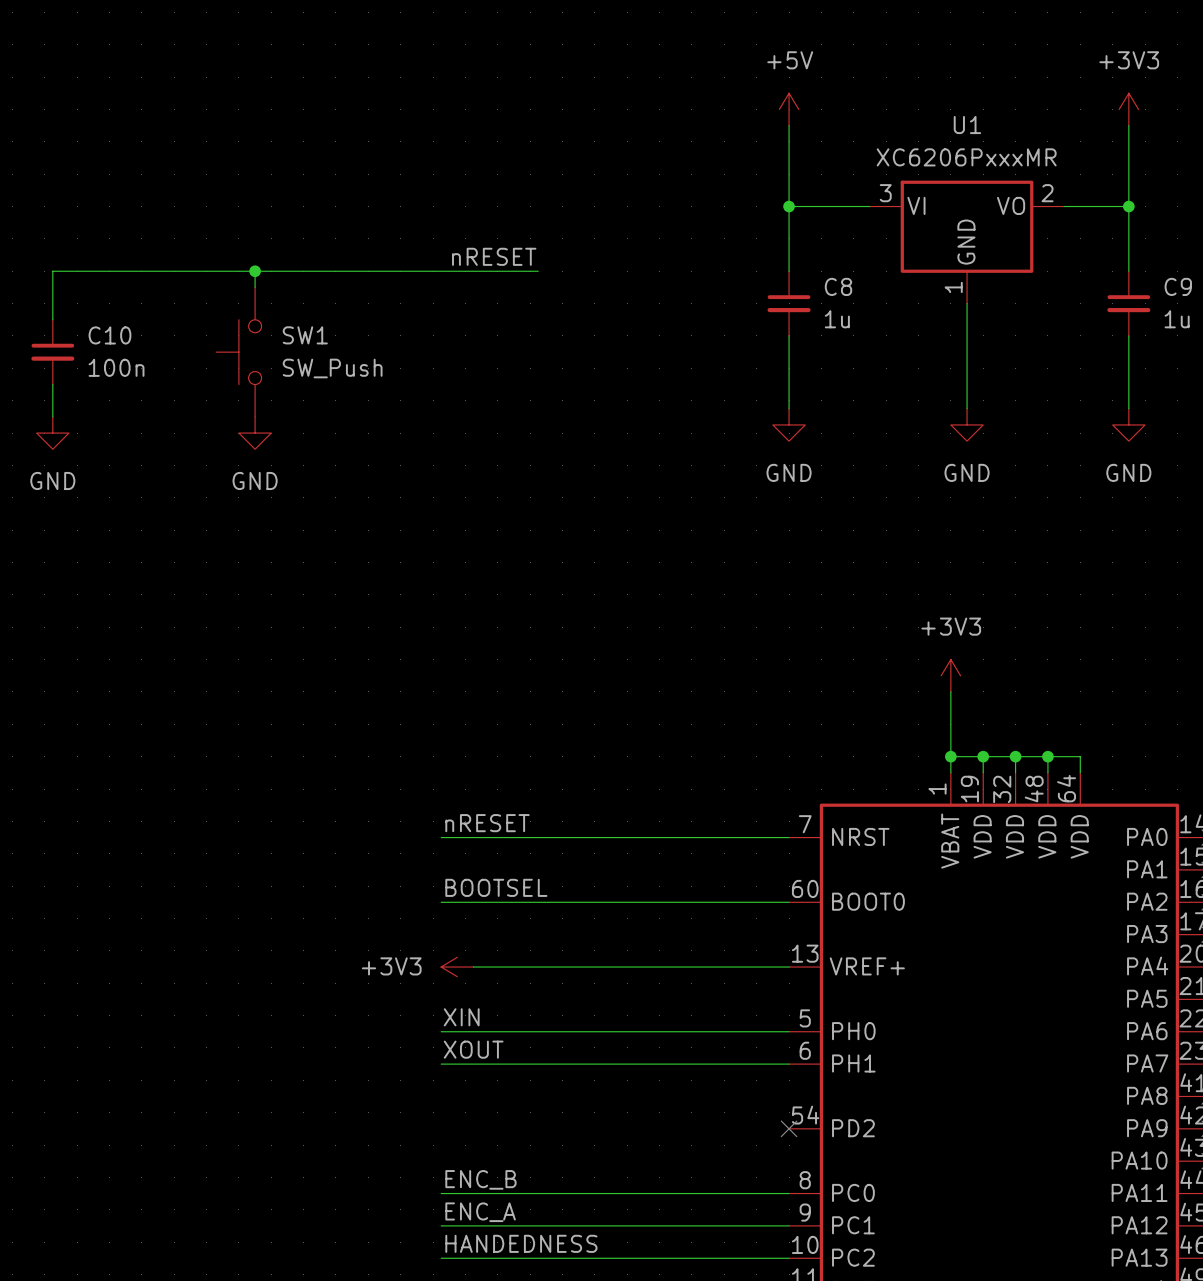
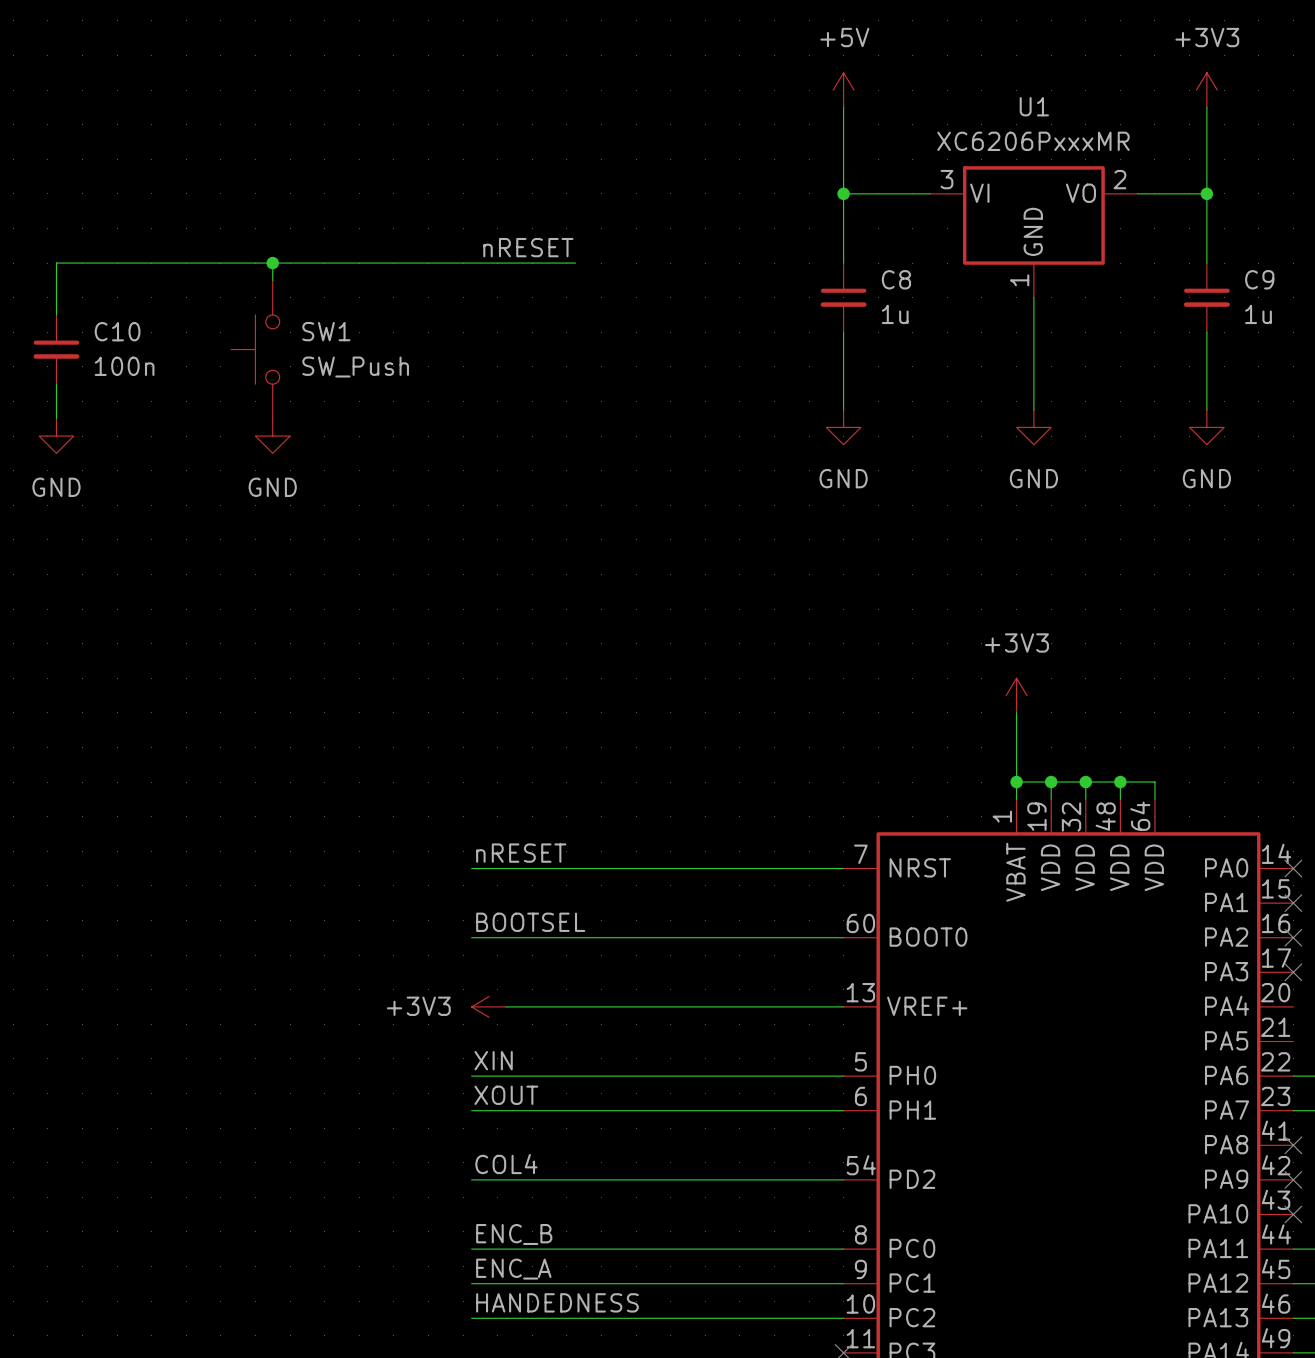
label: none -> COL4 (506, 1164)
wire: none -> (471, 1179) (843, 1179)
no-connect mark: (789, 1128) -> none

